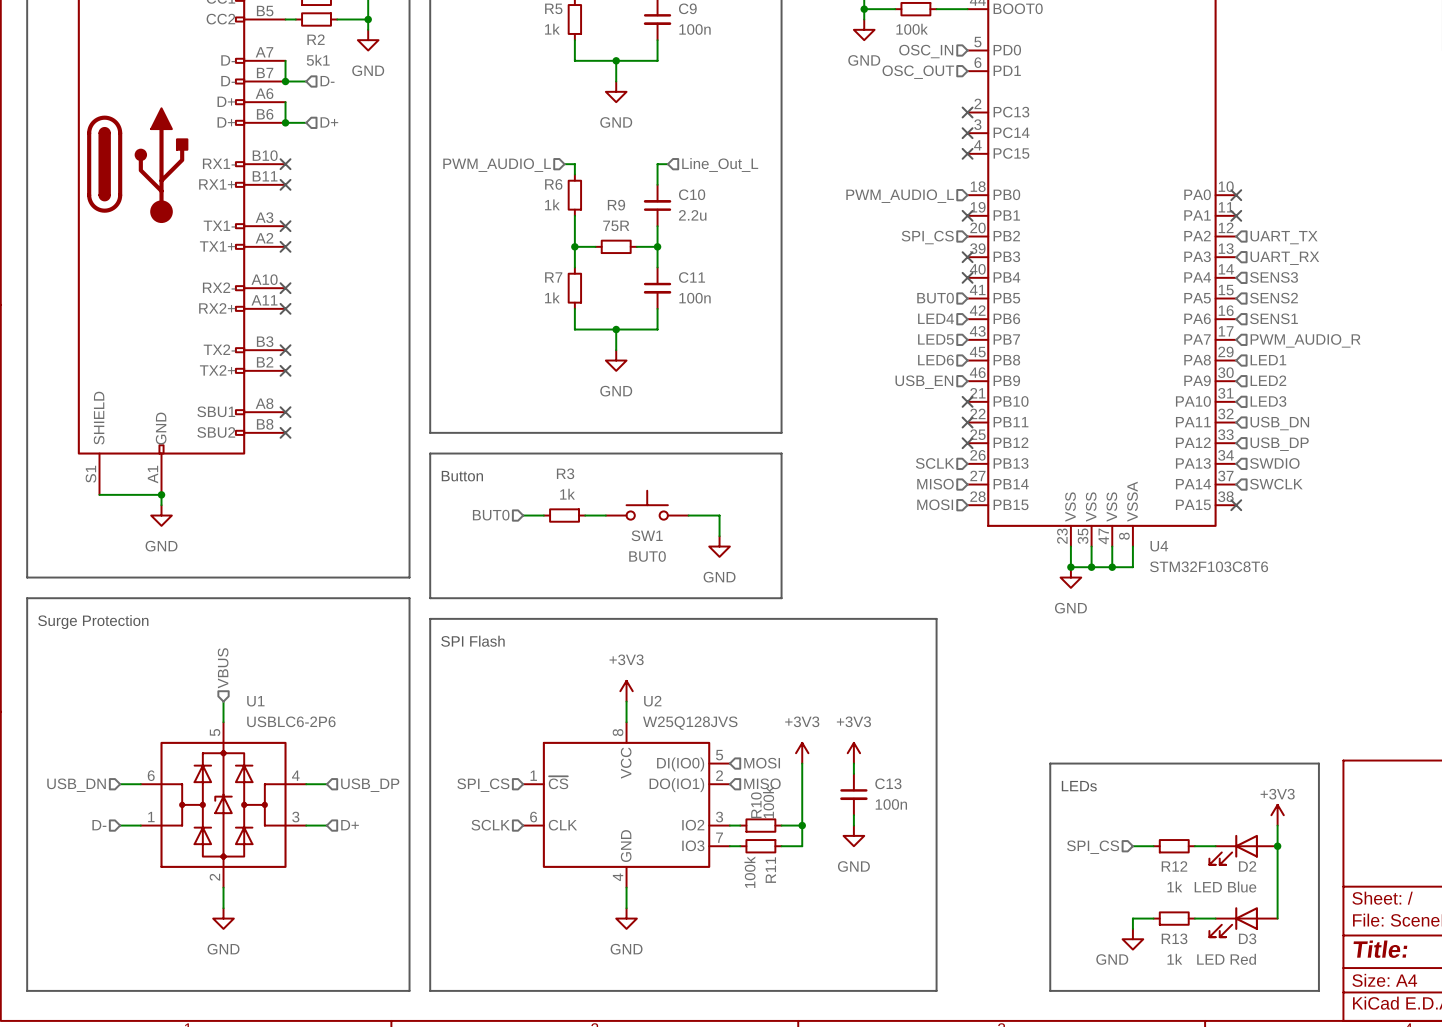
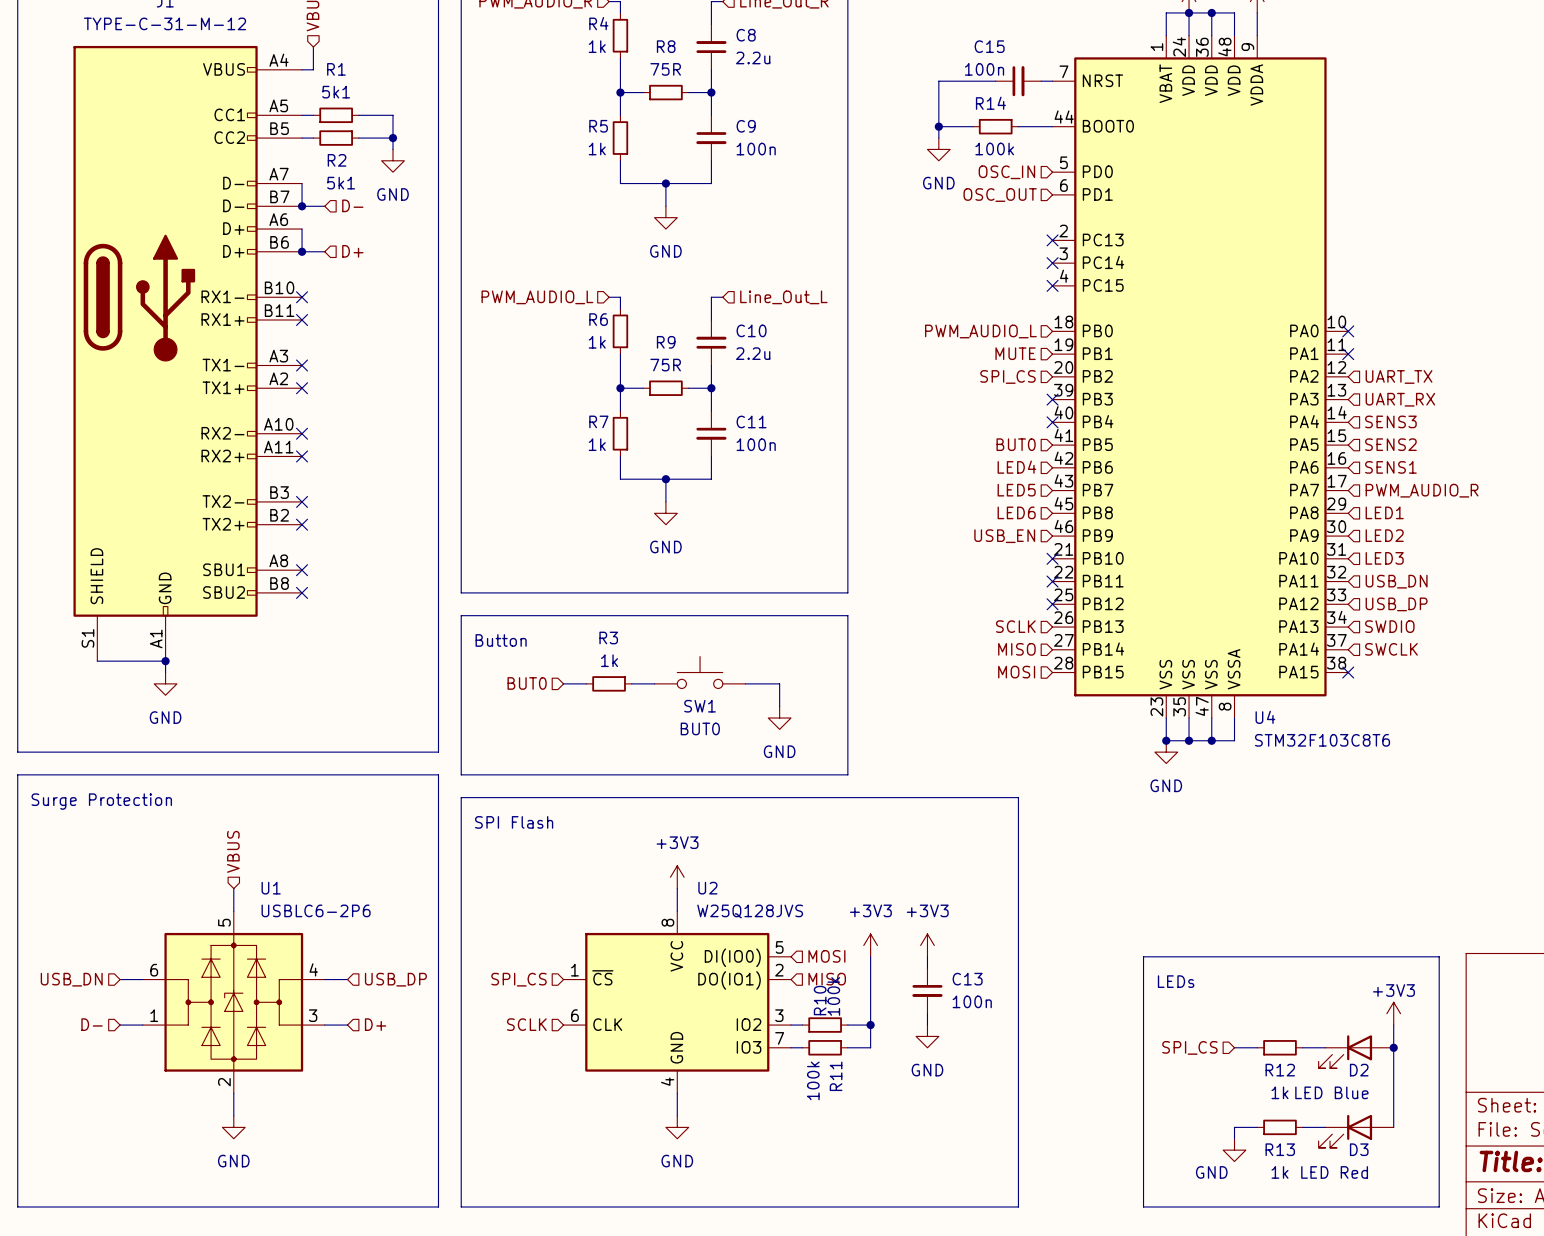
hierarchical label: none -> MUTE (1015, 353)
no-connect mark: (967, 215) -> none

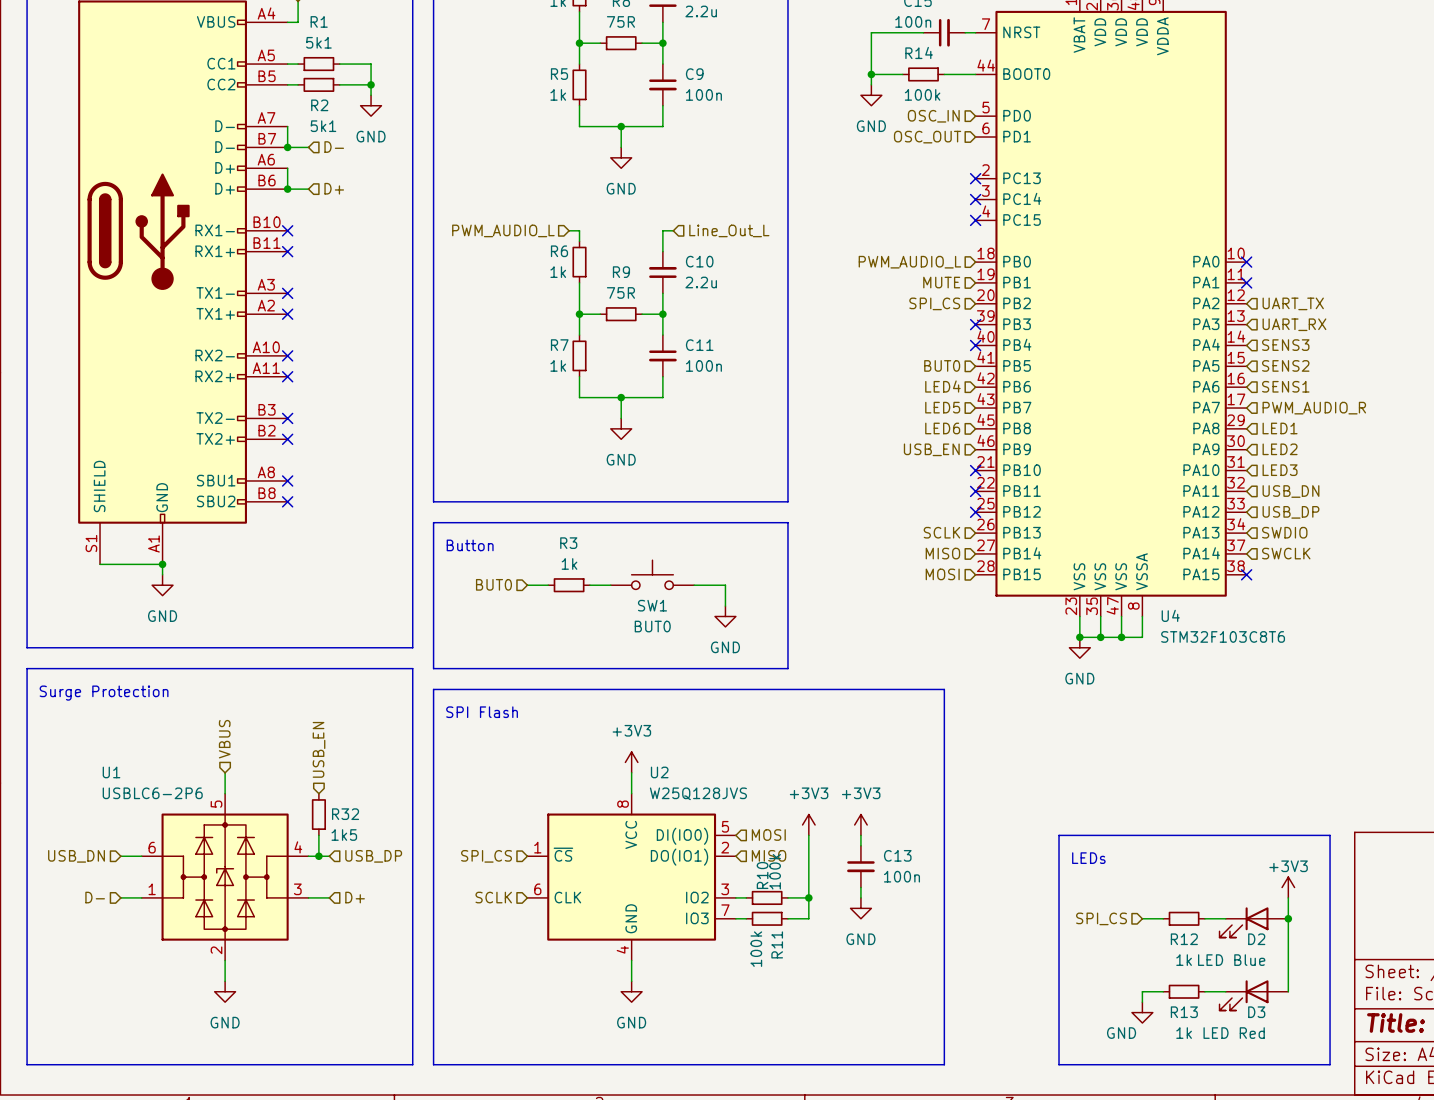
hierarchical label: none -> USB_EN (319, 749)
U1 name position: U1 (271, 888) -> U1 (111, 772)
U1 value position: USBLC6-2P6 (316, 910) -> USBLC6-2P6 (152, 793)
R32: none -> 1k5 (318, 814)
wire: none -> (318, 835) (318, 856)
junction: none -> (318, 856)

